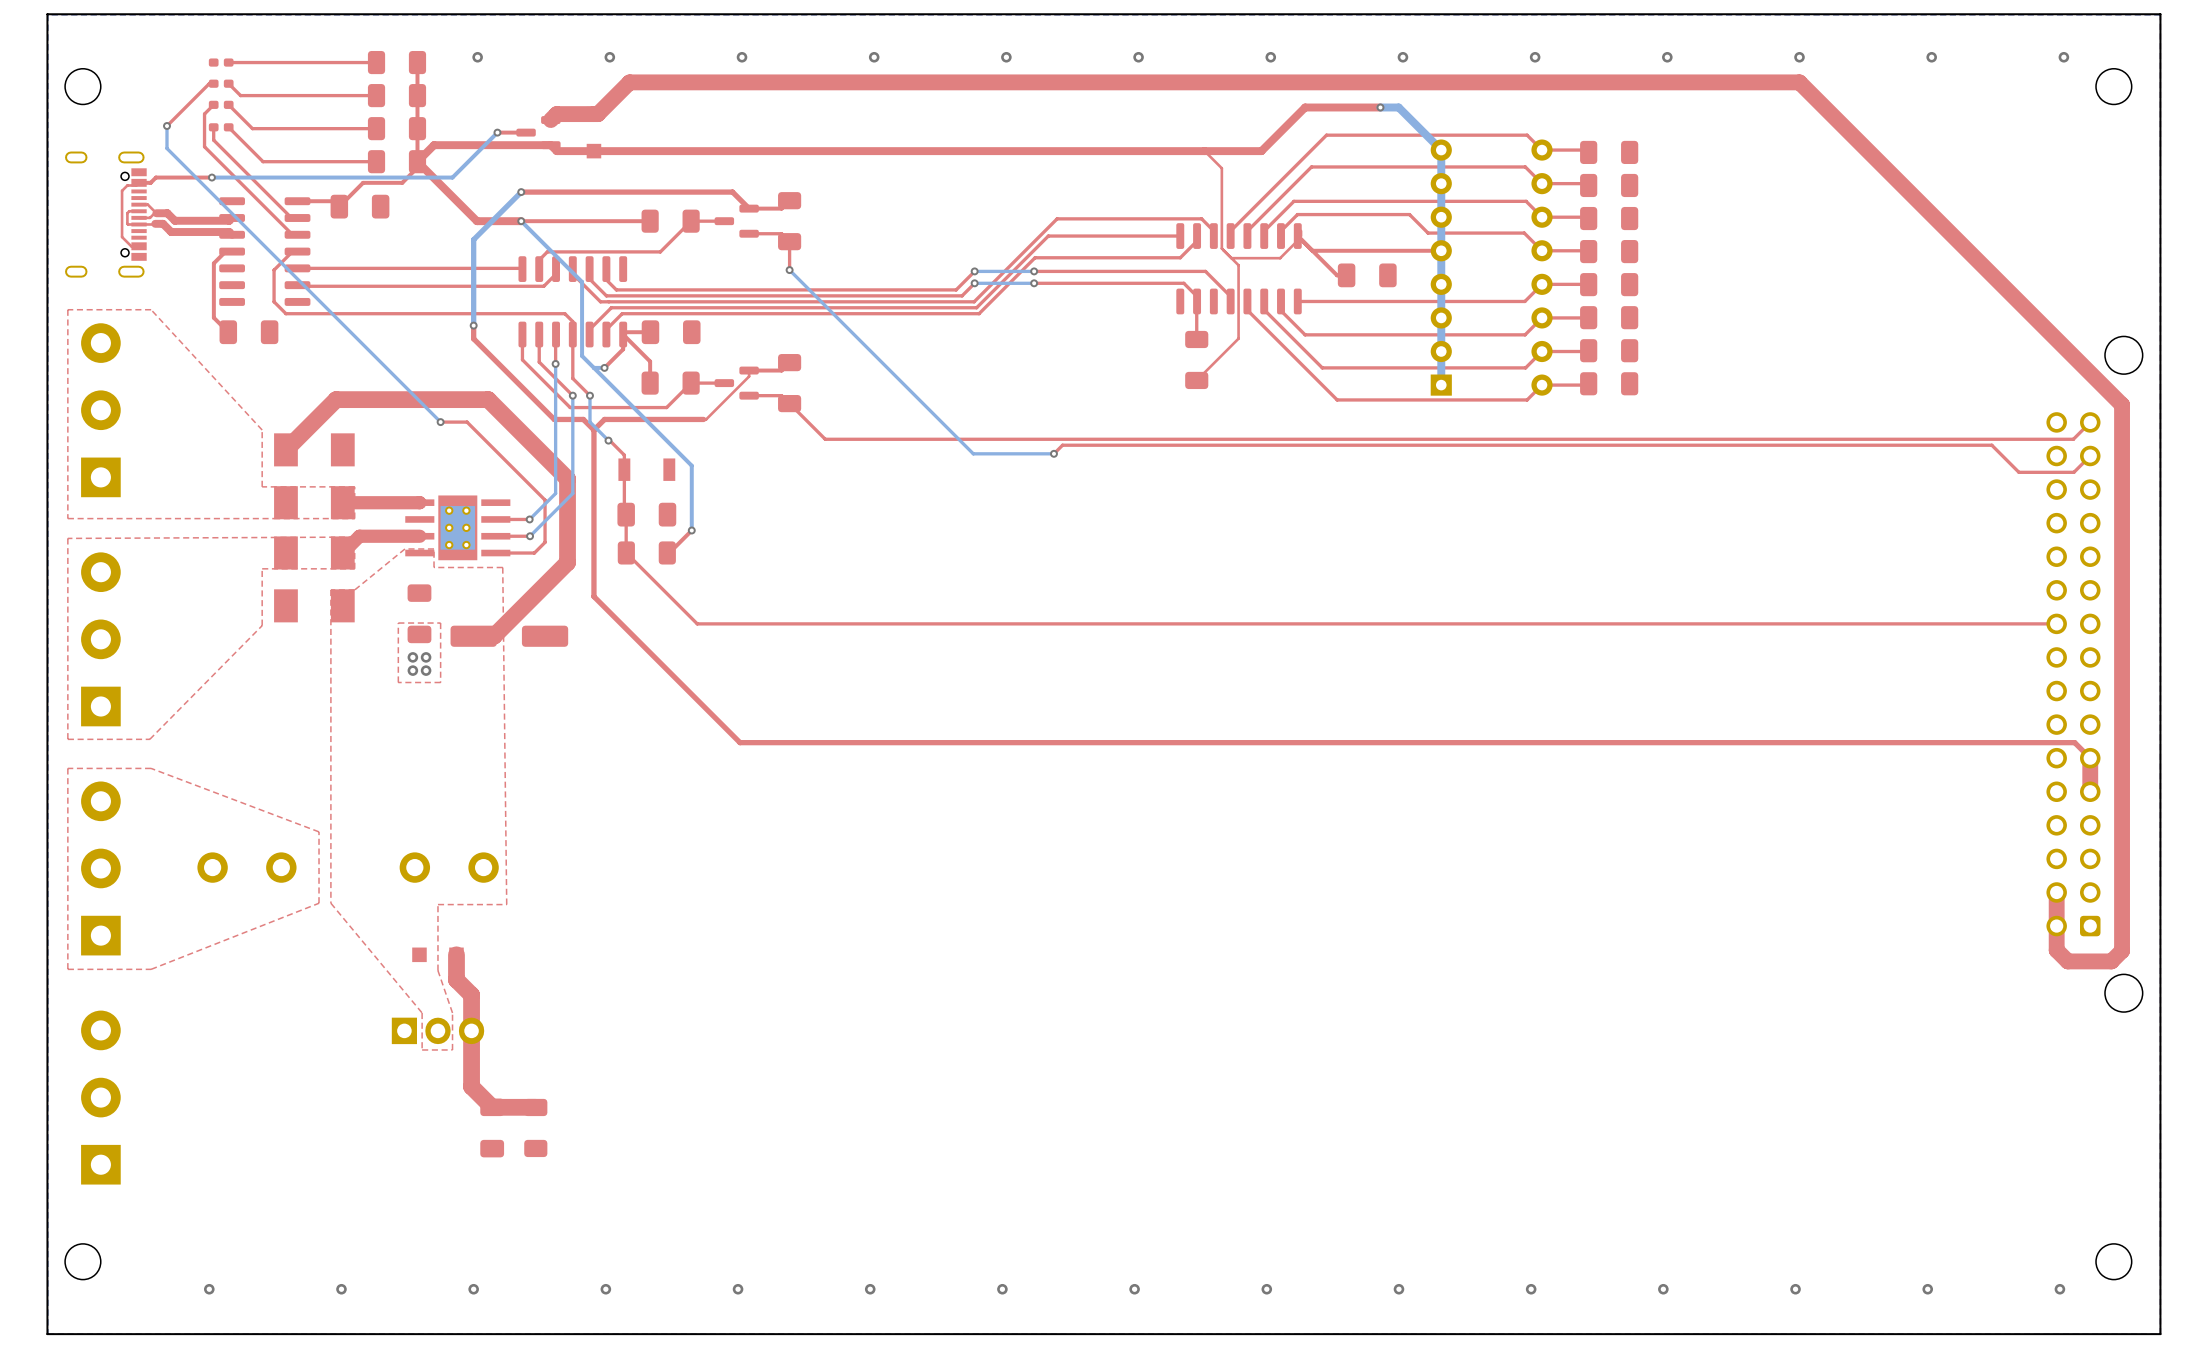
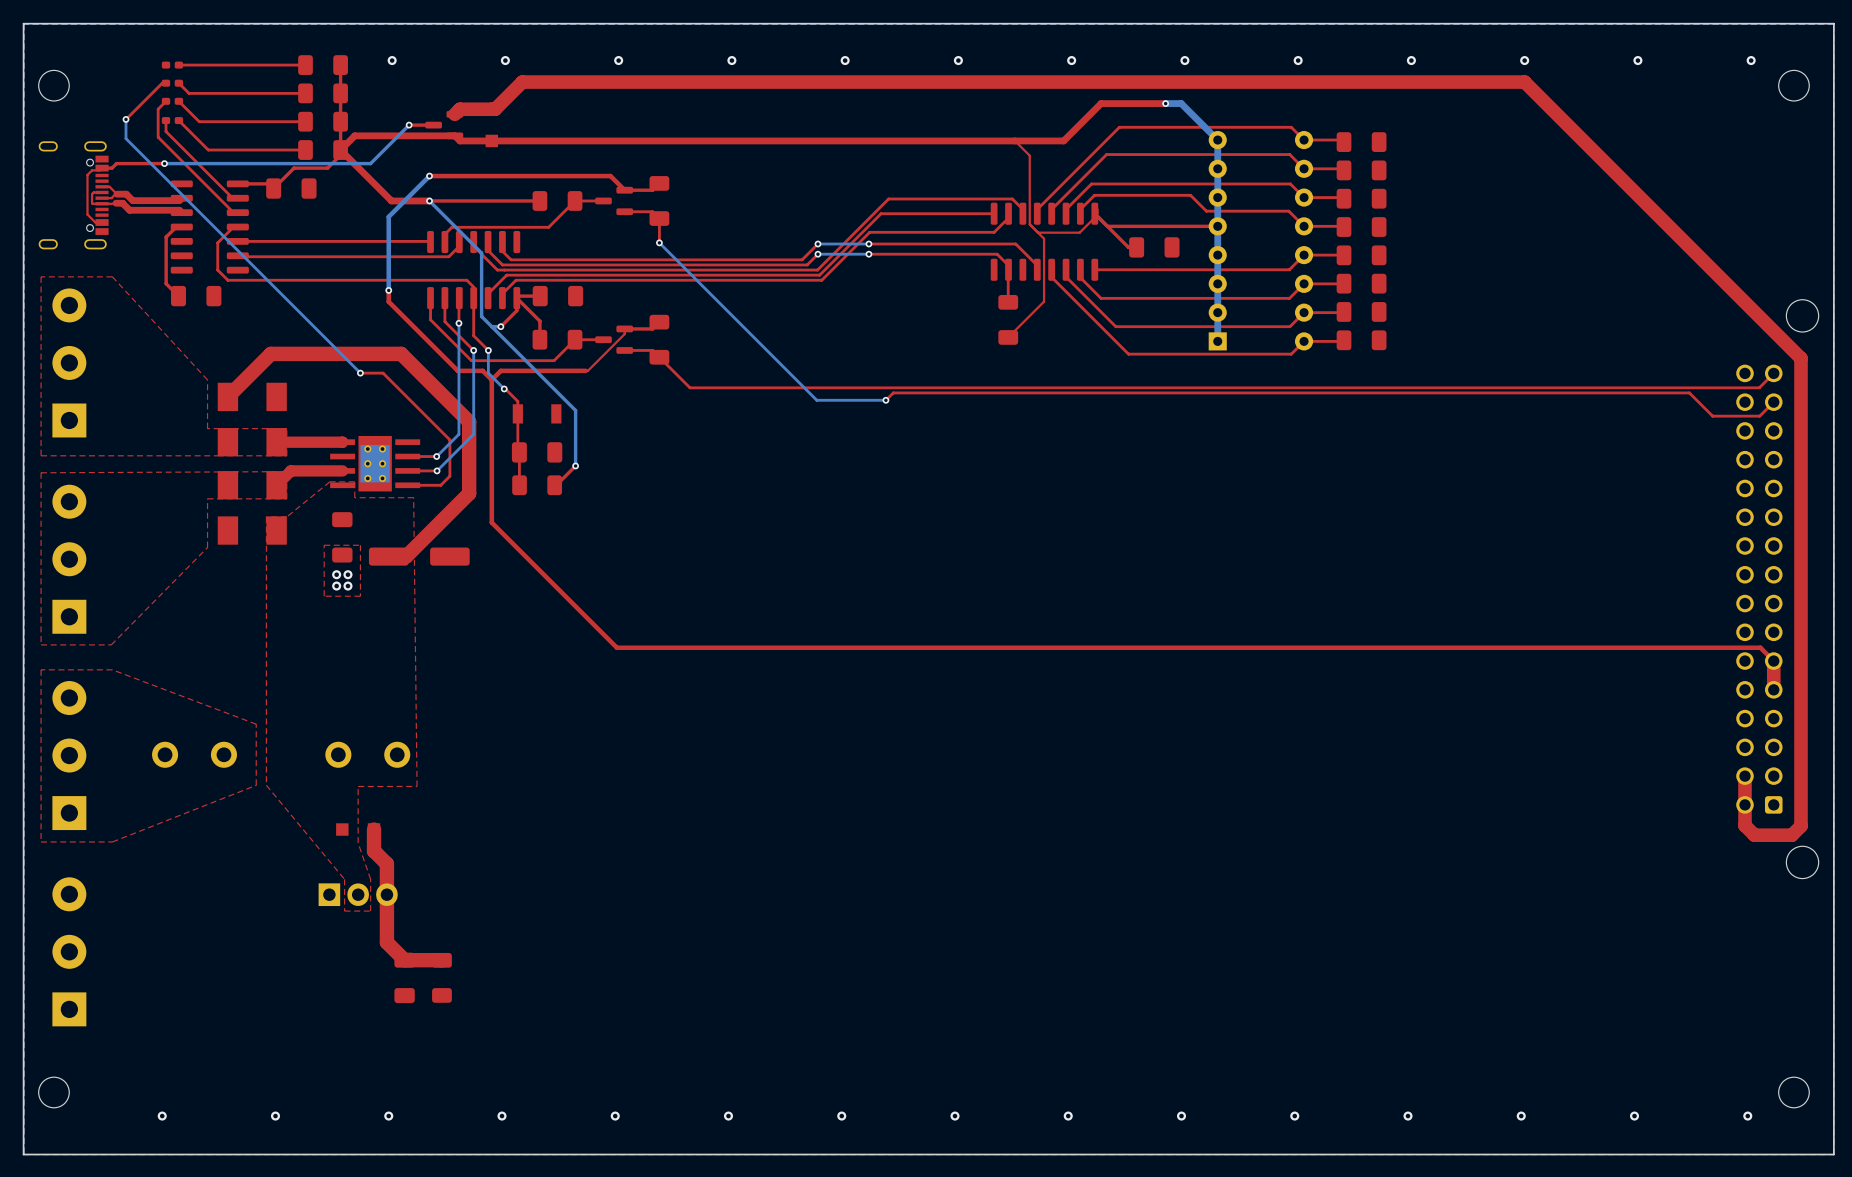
top track: (626, 552) (697, 623) (2056, 623) -> none

